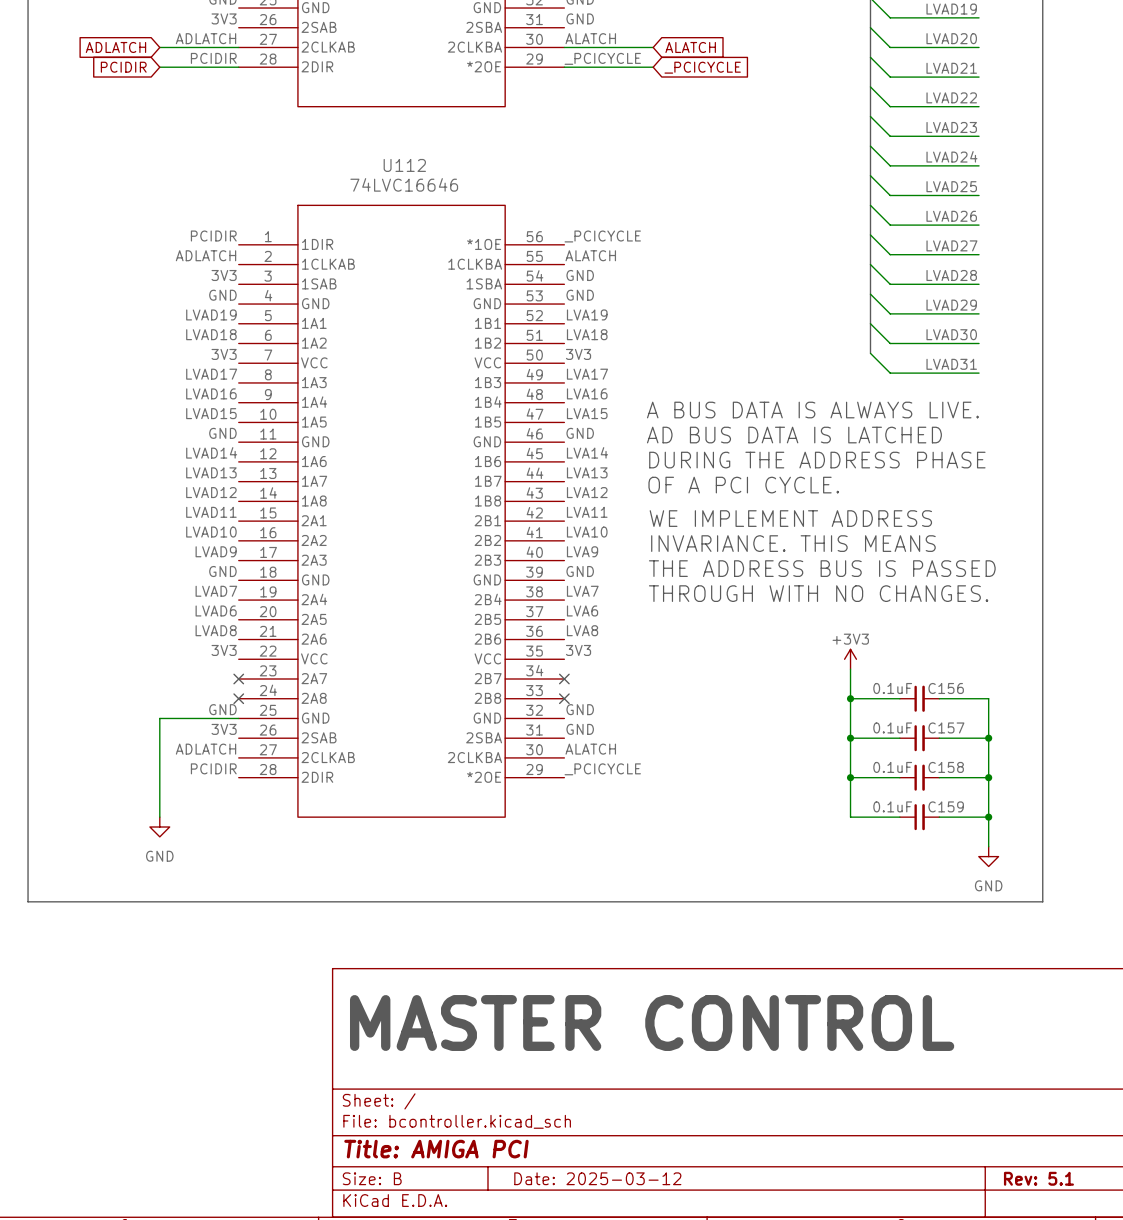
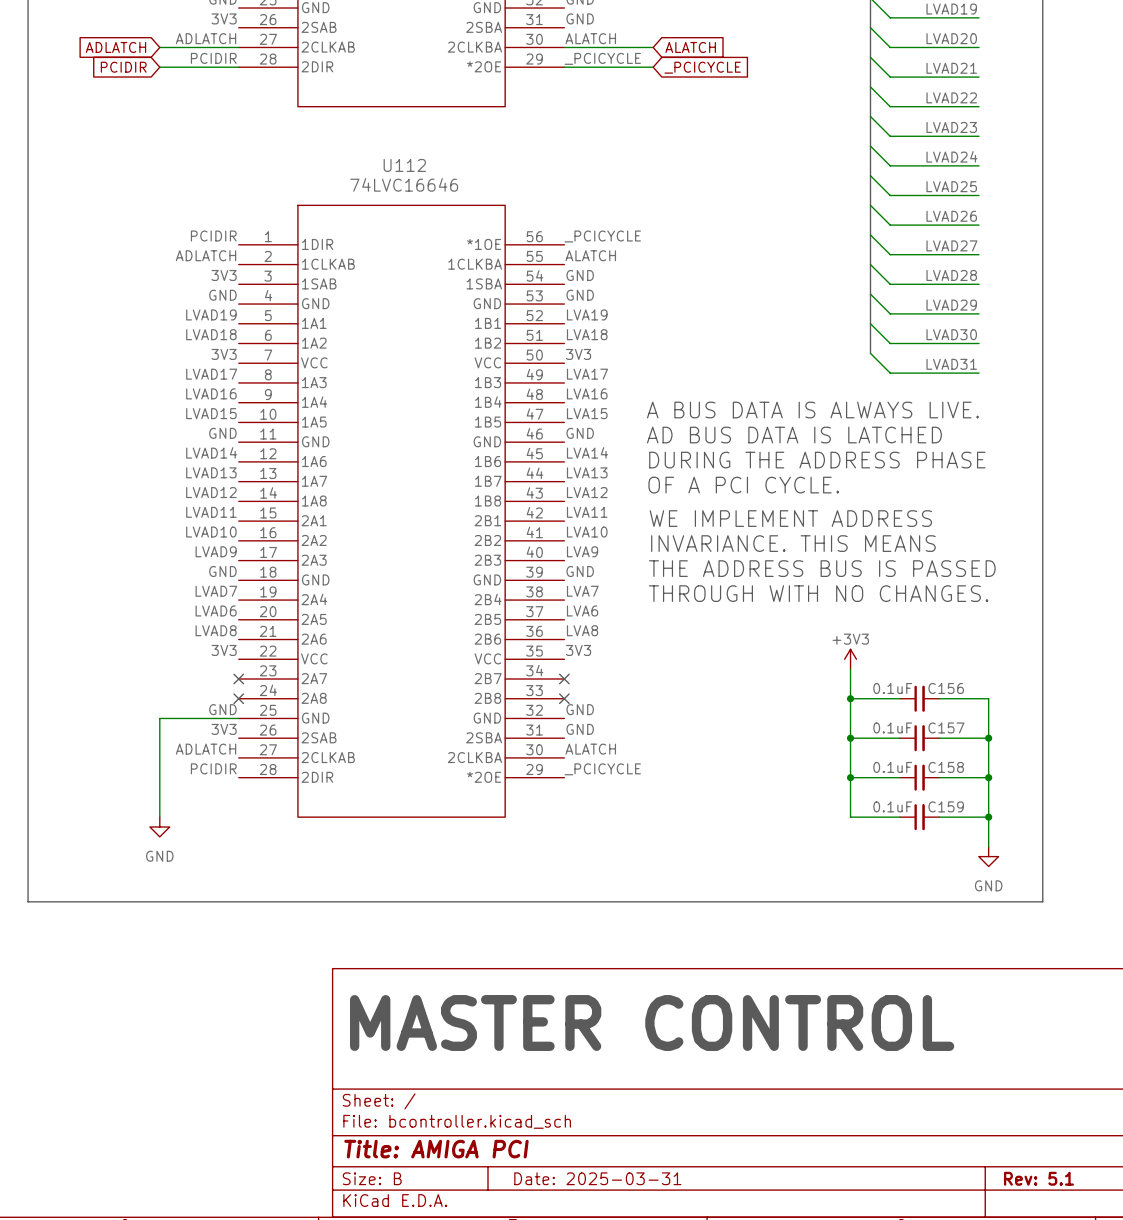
title block: Date: 2025-03-12 (597, 1178) -> Date: 2025-03-31 (597, 1178)

